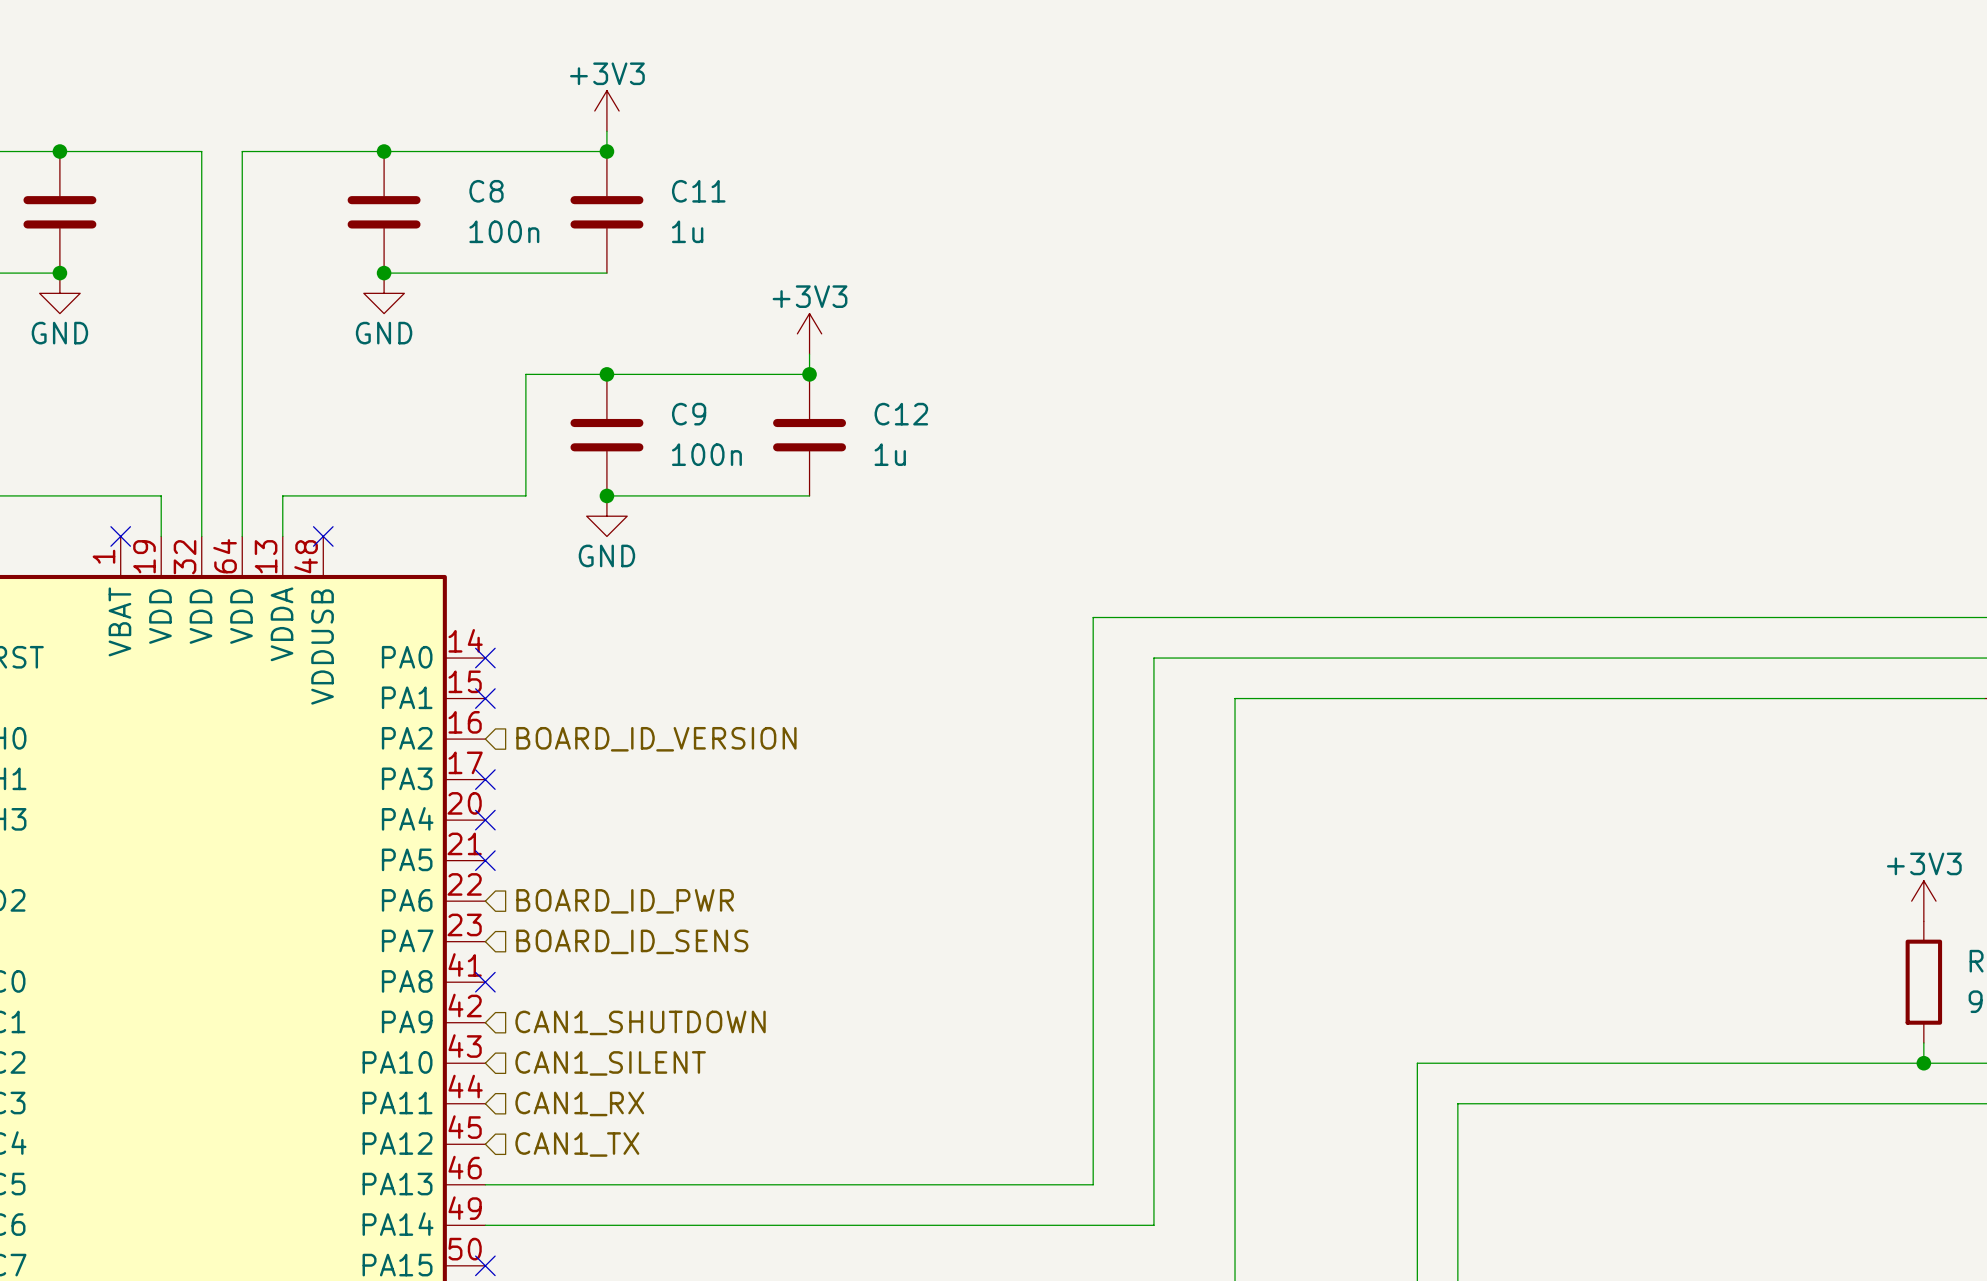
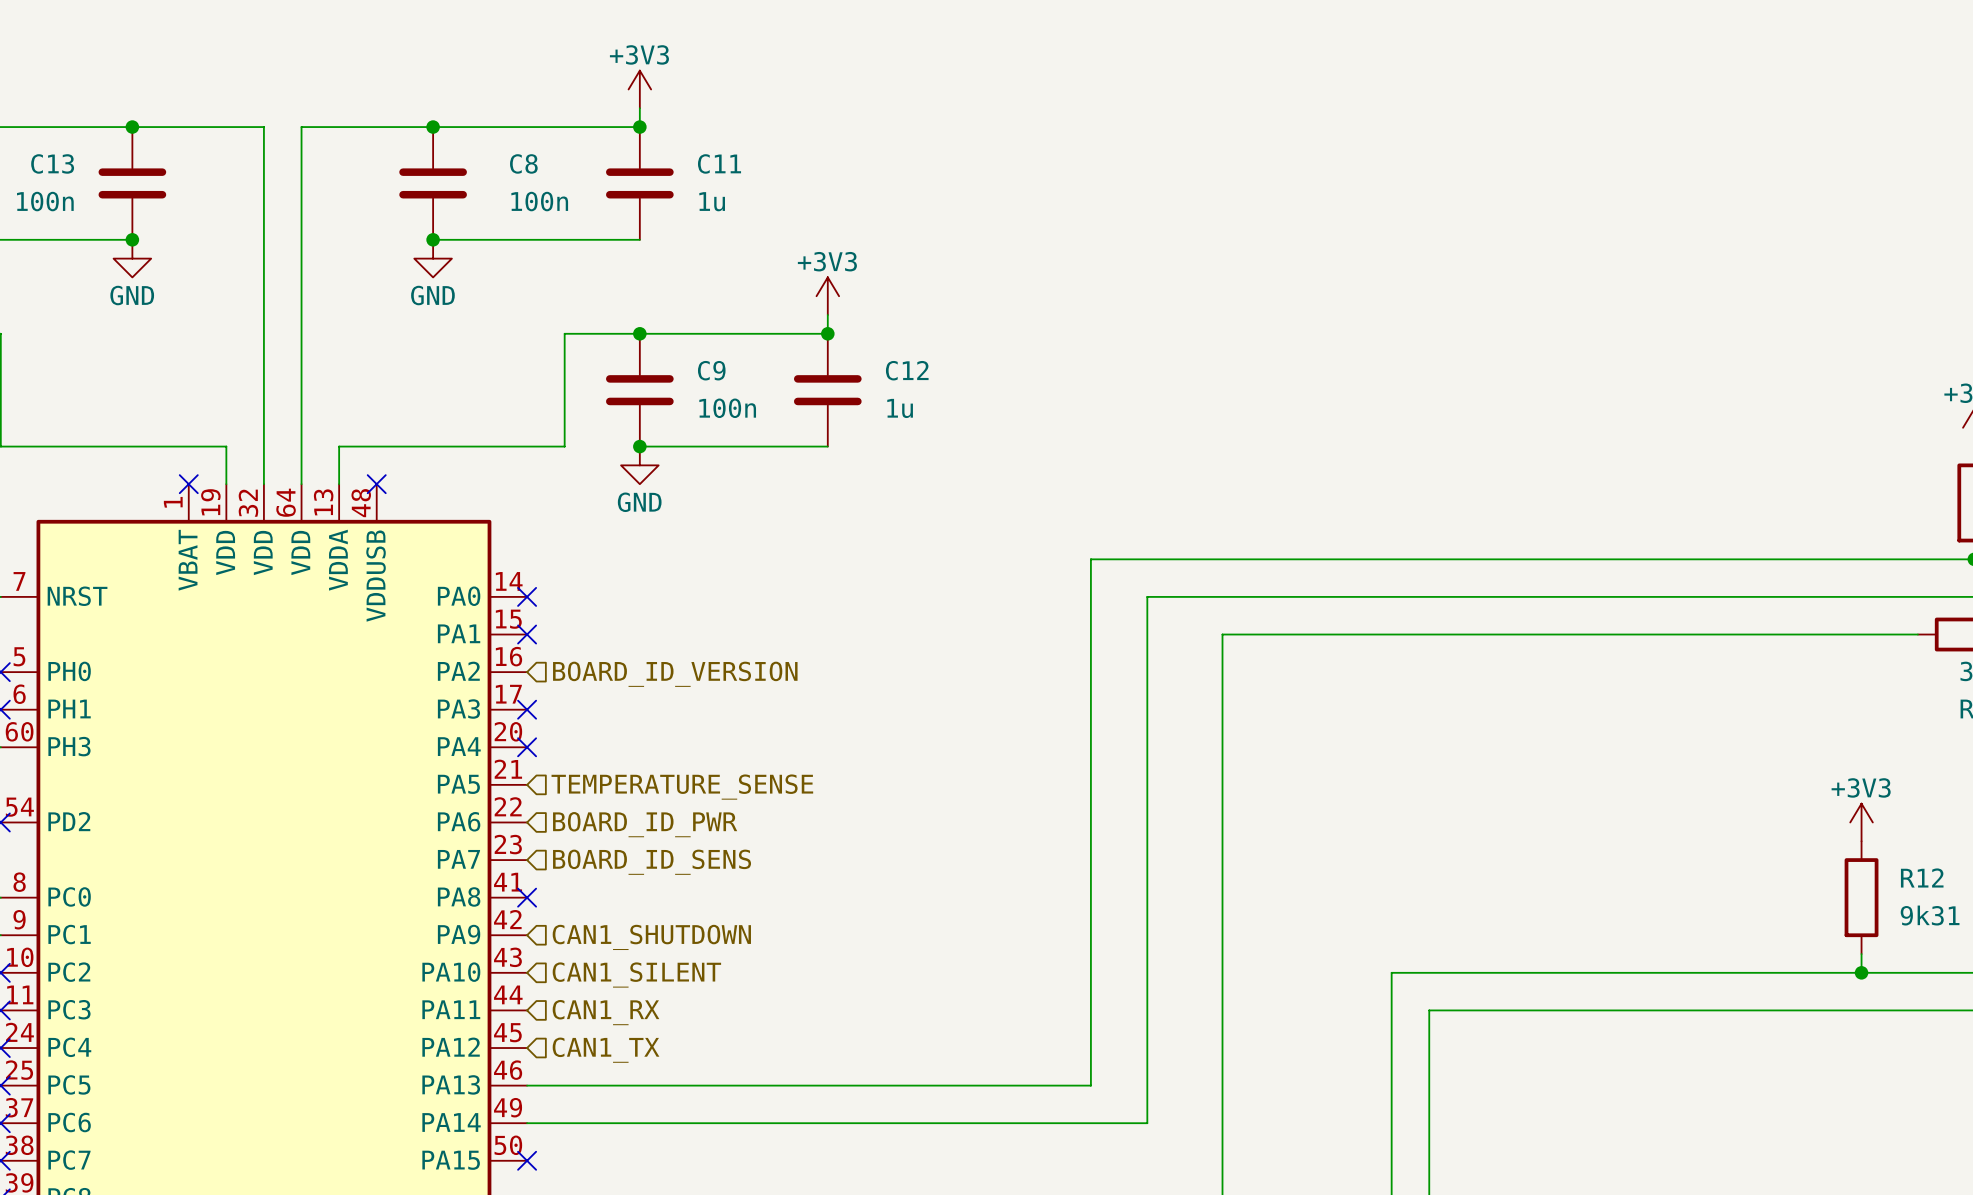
no-connect mark: (485, 860) -> none
hierarchical label: none -> TEMPERATURE_SENSE (682, 787)

